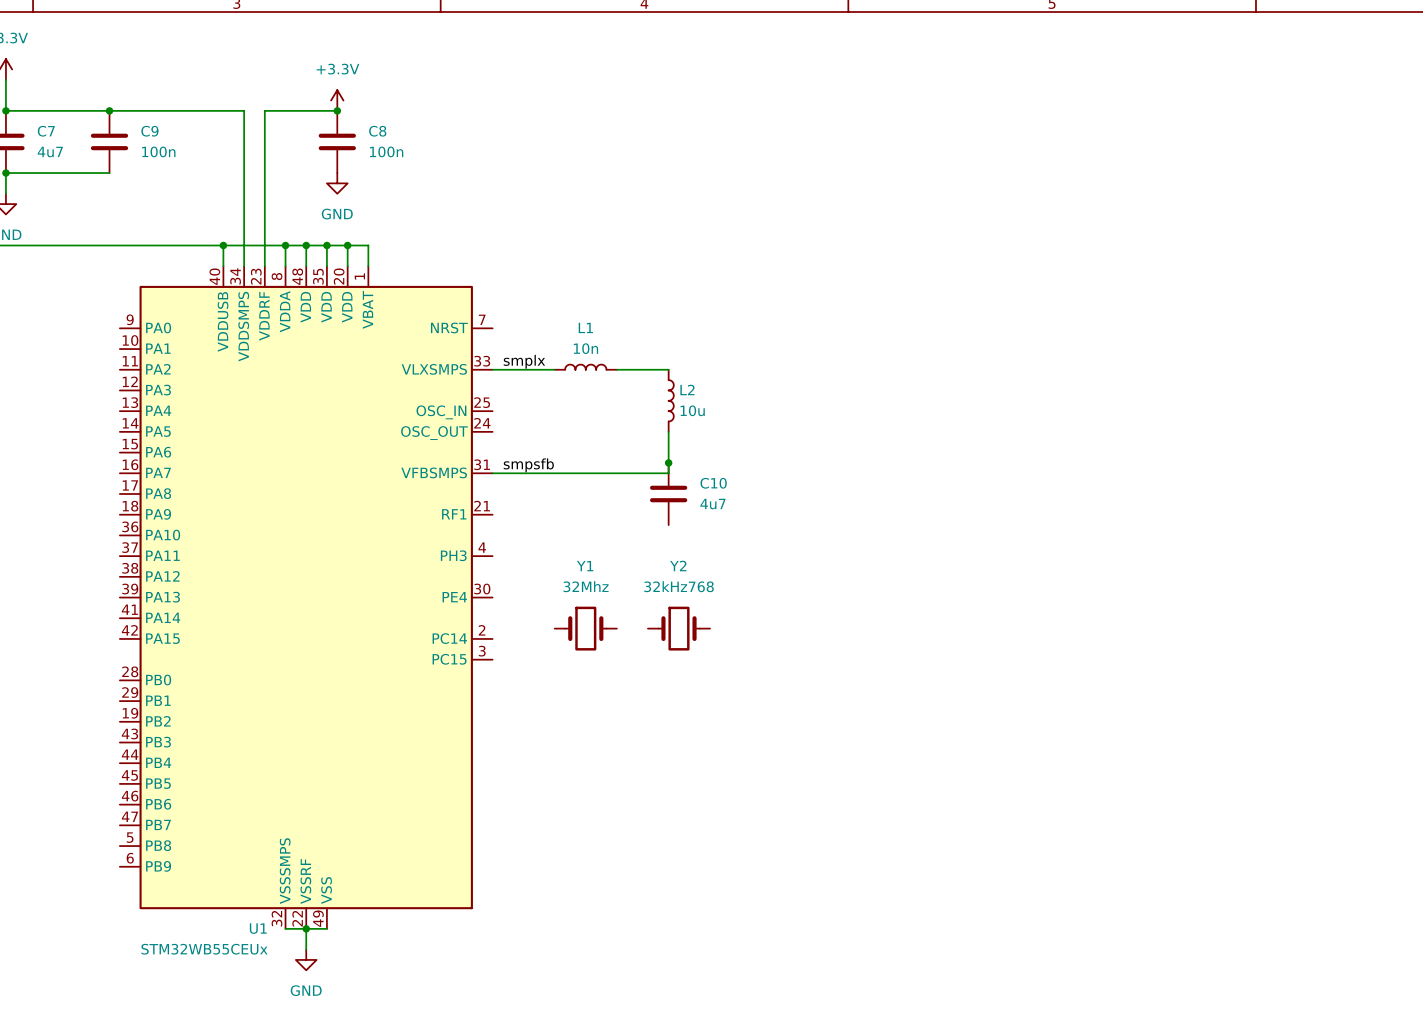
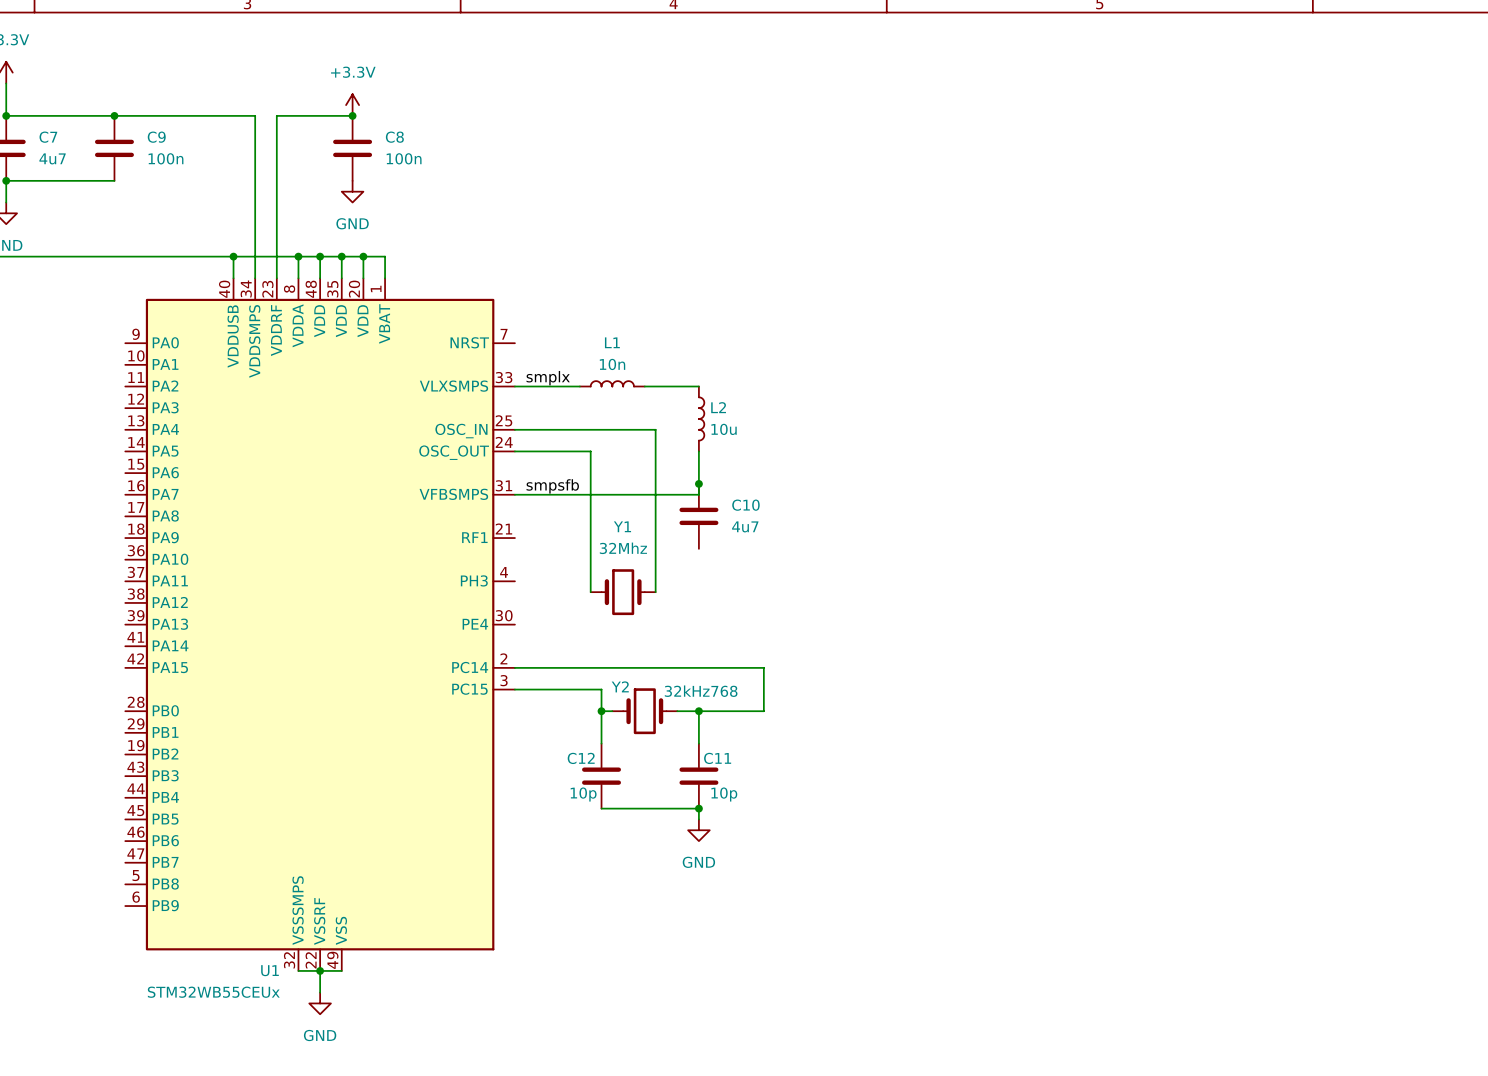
wire: none -> (514, 429) (655, 429) (655, 592)
wire: none -> (514, 451) (590, 451) (590, 592)
Y2 name position: Y2 (678, 566) -> Y2 (620, 686)
Y2 value position: 32kHz768 (679, 586) -> 32kHz768 (701, 691)
Y1 position: (585, 628) -> (623, 592)
Y2 position: (678, 628) -> (644, 711)
wire: none -> (514, 667) (763, 667) (763, 711) (677, 711)
wire: none -> (514, 689) (601, 689) (601, 743)
wire: none -> (601, 711) (612, 711)
junction: none -> (601, 711)
wire: none -> (698, 711) (698, 743)
junction: none -> (698, 711)
C12: none -> 10p (601, 776)
C11: none -> 10p (698, 776)
wire: none -> (601, 808) (698, 808) (698, 819)
junction: none -> (698, 808)
power symbol: none -> GND (698, 830)

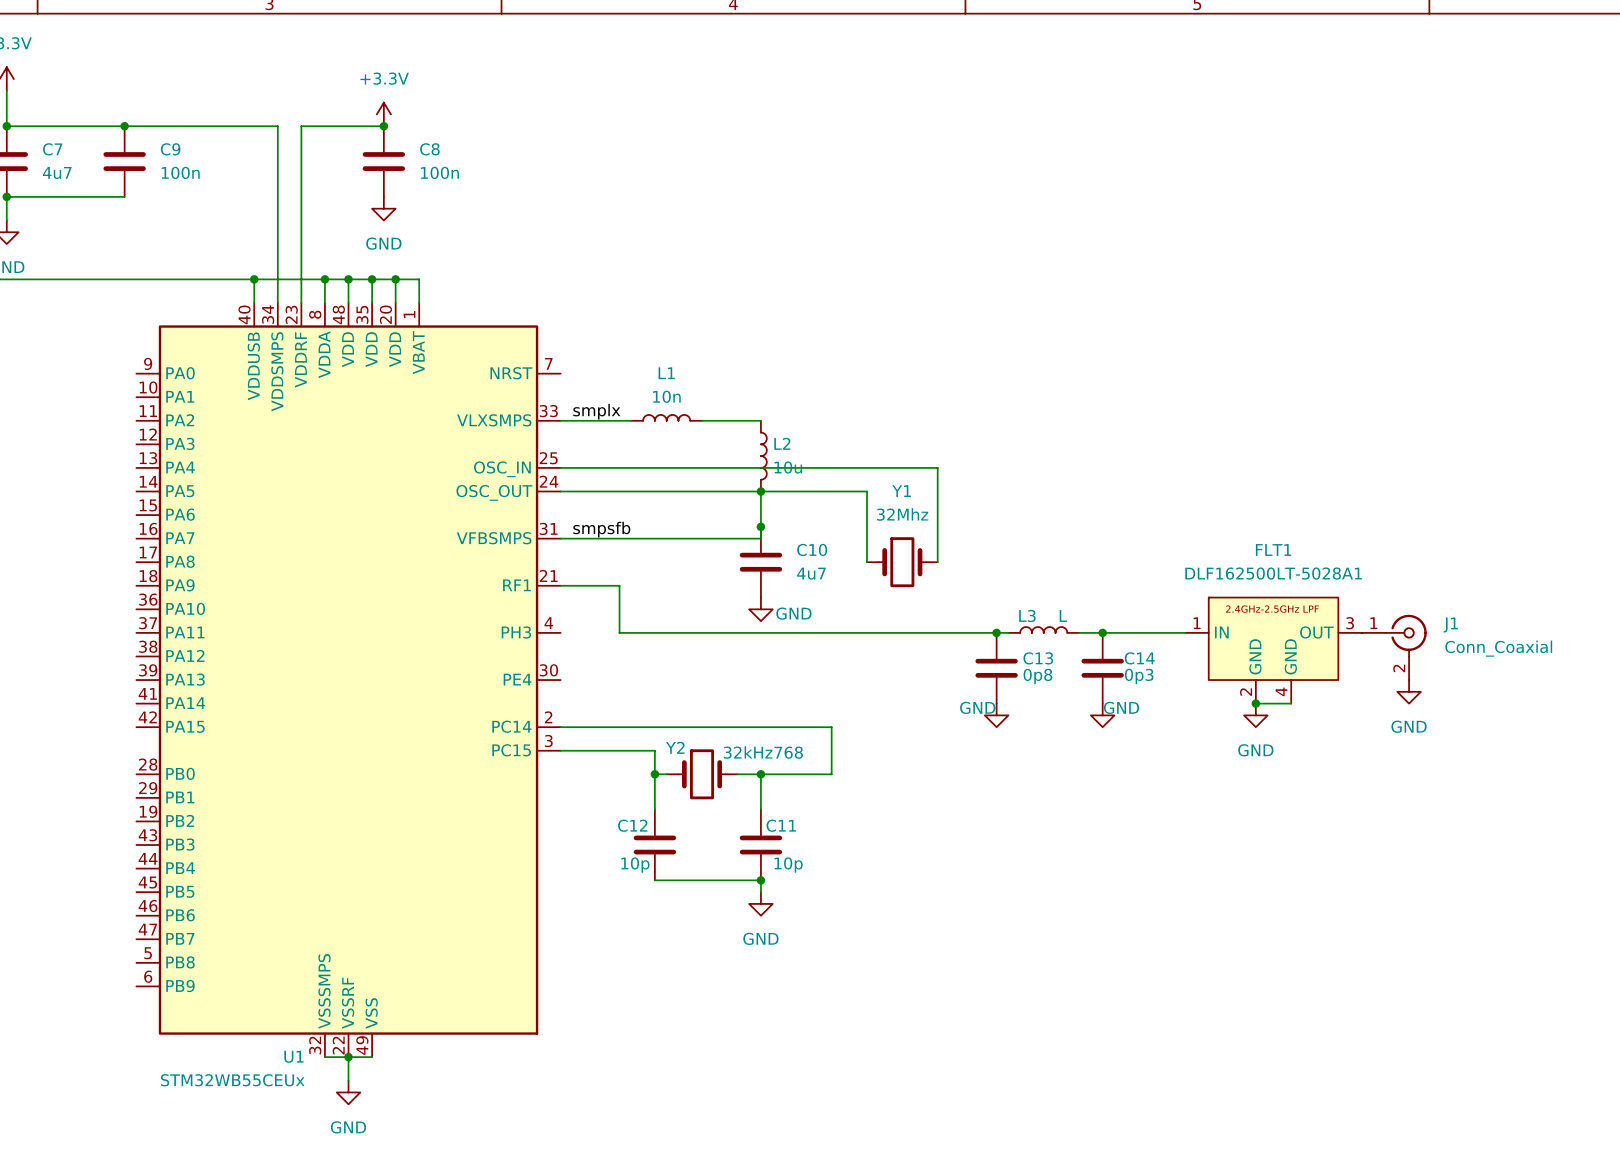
wire: (655, 429) (655, 592) -> (713, 467) (937, 467) (937, 562)
wire: (590, 451) (590, 592) -> (643, 491) (867, 491) (867, 562)
junction: none -> (760, 491)
wire: none -> (560, 585) (619, 585) (619, 632) (1008, 632)
power symbol: none -> GND (760, 609)
L3: none -> L (1043, 629)
junction: none -> (996, 632)
wire: none -> (1079, 632) (1185, 632)
junction: none -> (1102, 632)
Y1 position: (623, 592) -> (902, 562)
J1: none -> Conn_Coaxial (1394, 647)
FLT1: none -> DLF162500LT-5028A1 (1273, 650)
C13: none -> 0p8 (996, 668)
C14: none -> 0p3 (1102, 668)
power symbol: none -> GND (1409, 691)
wire: none -> (1255, 703) (1291, 703)
junction: none -> (1255, 703)
power symbol: none -> GND (996, 715)
power symbol: none -> GND (1102, 715)
power symbol: none -> GND (1255, 715)

